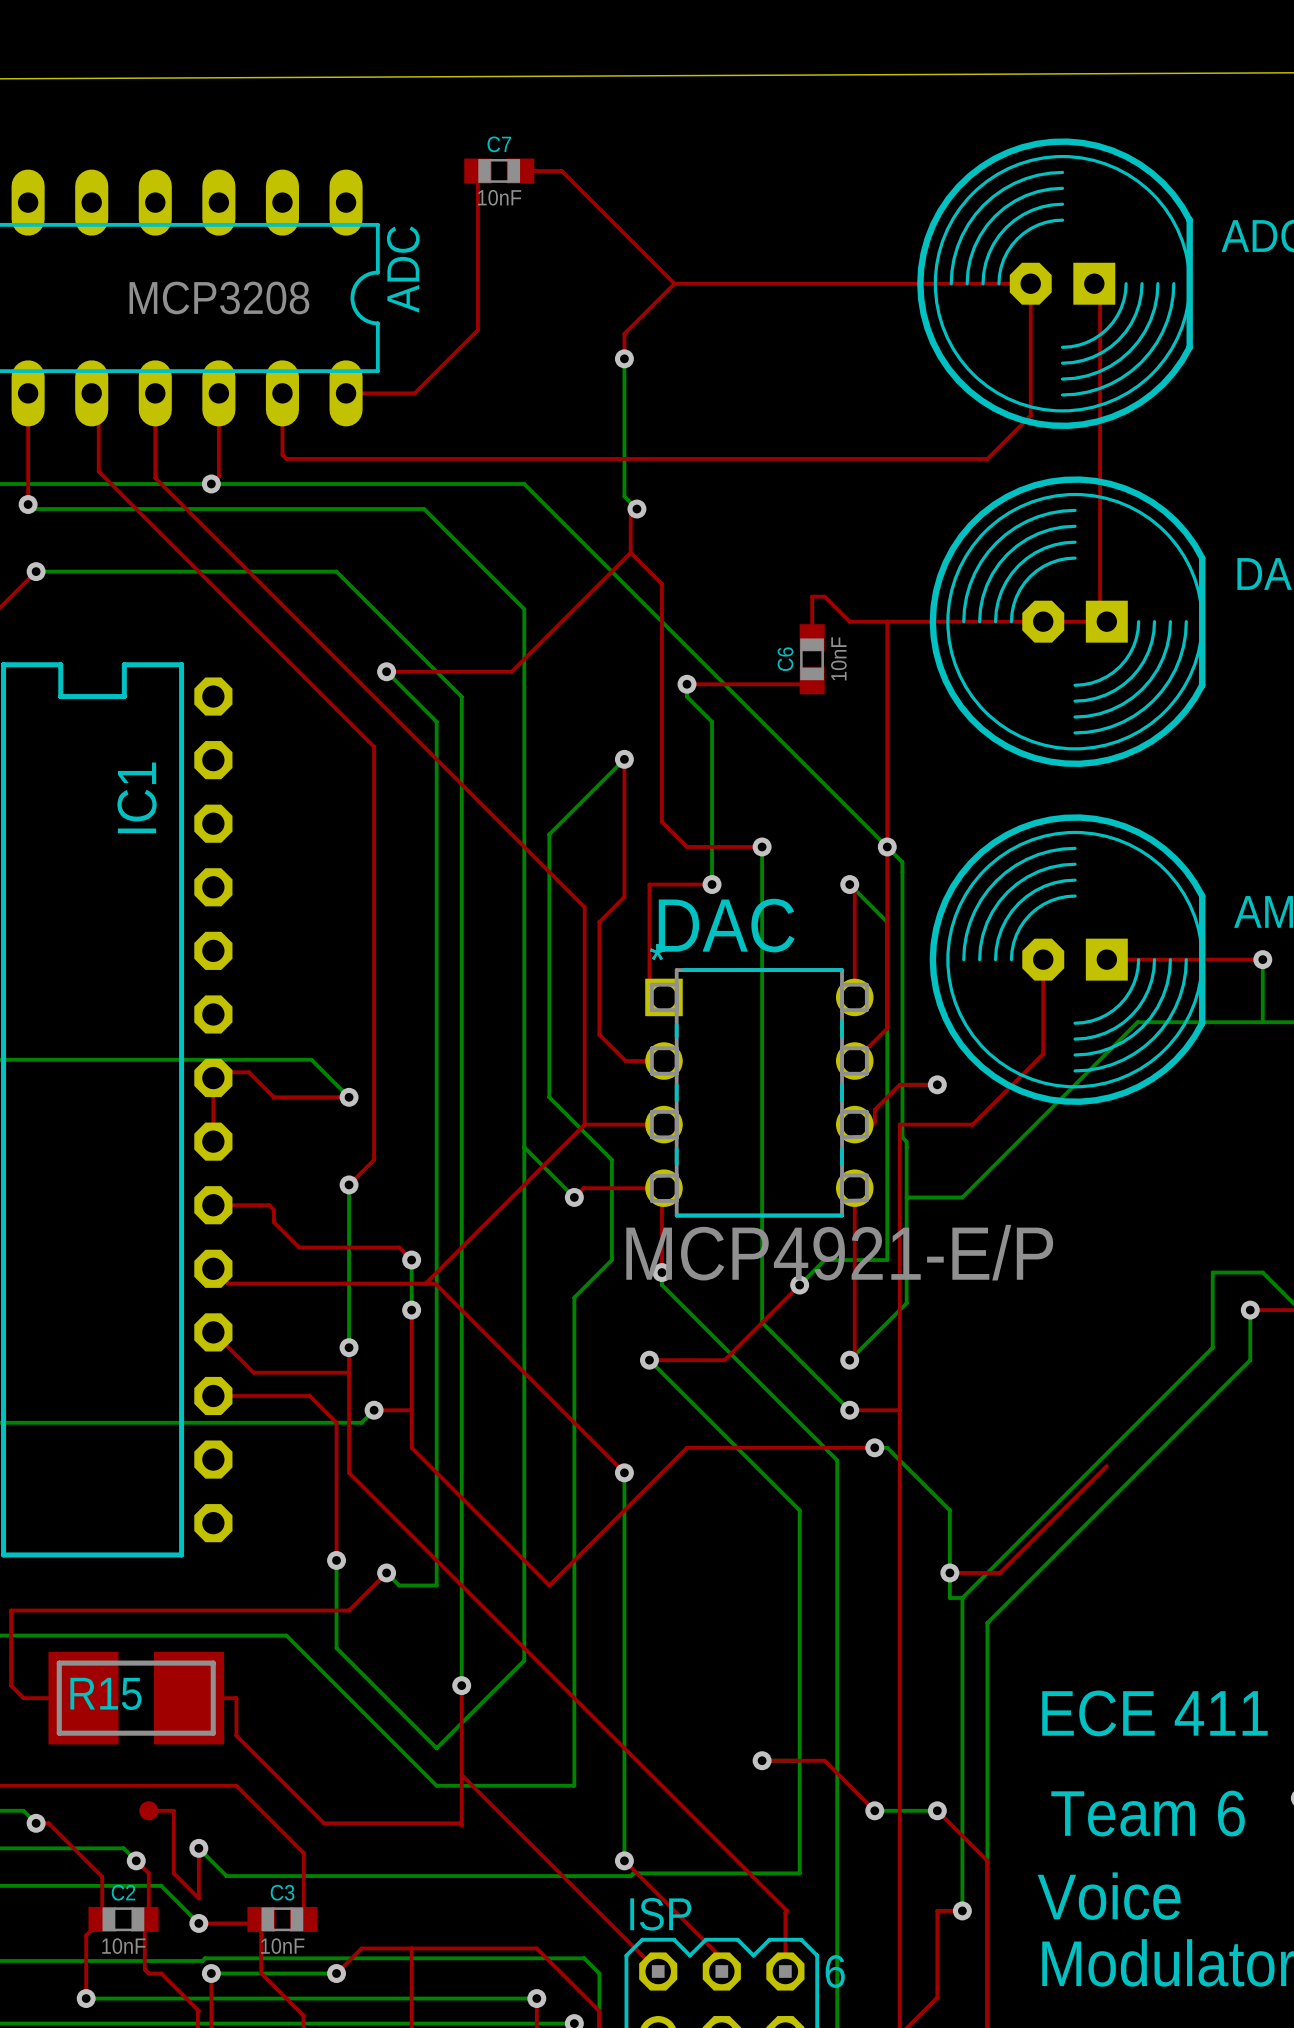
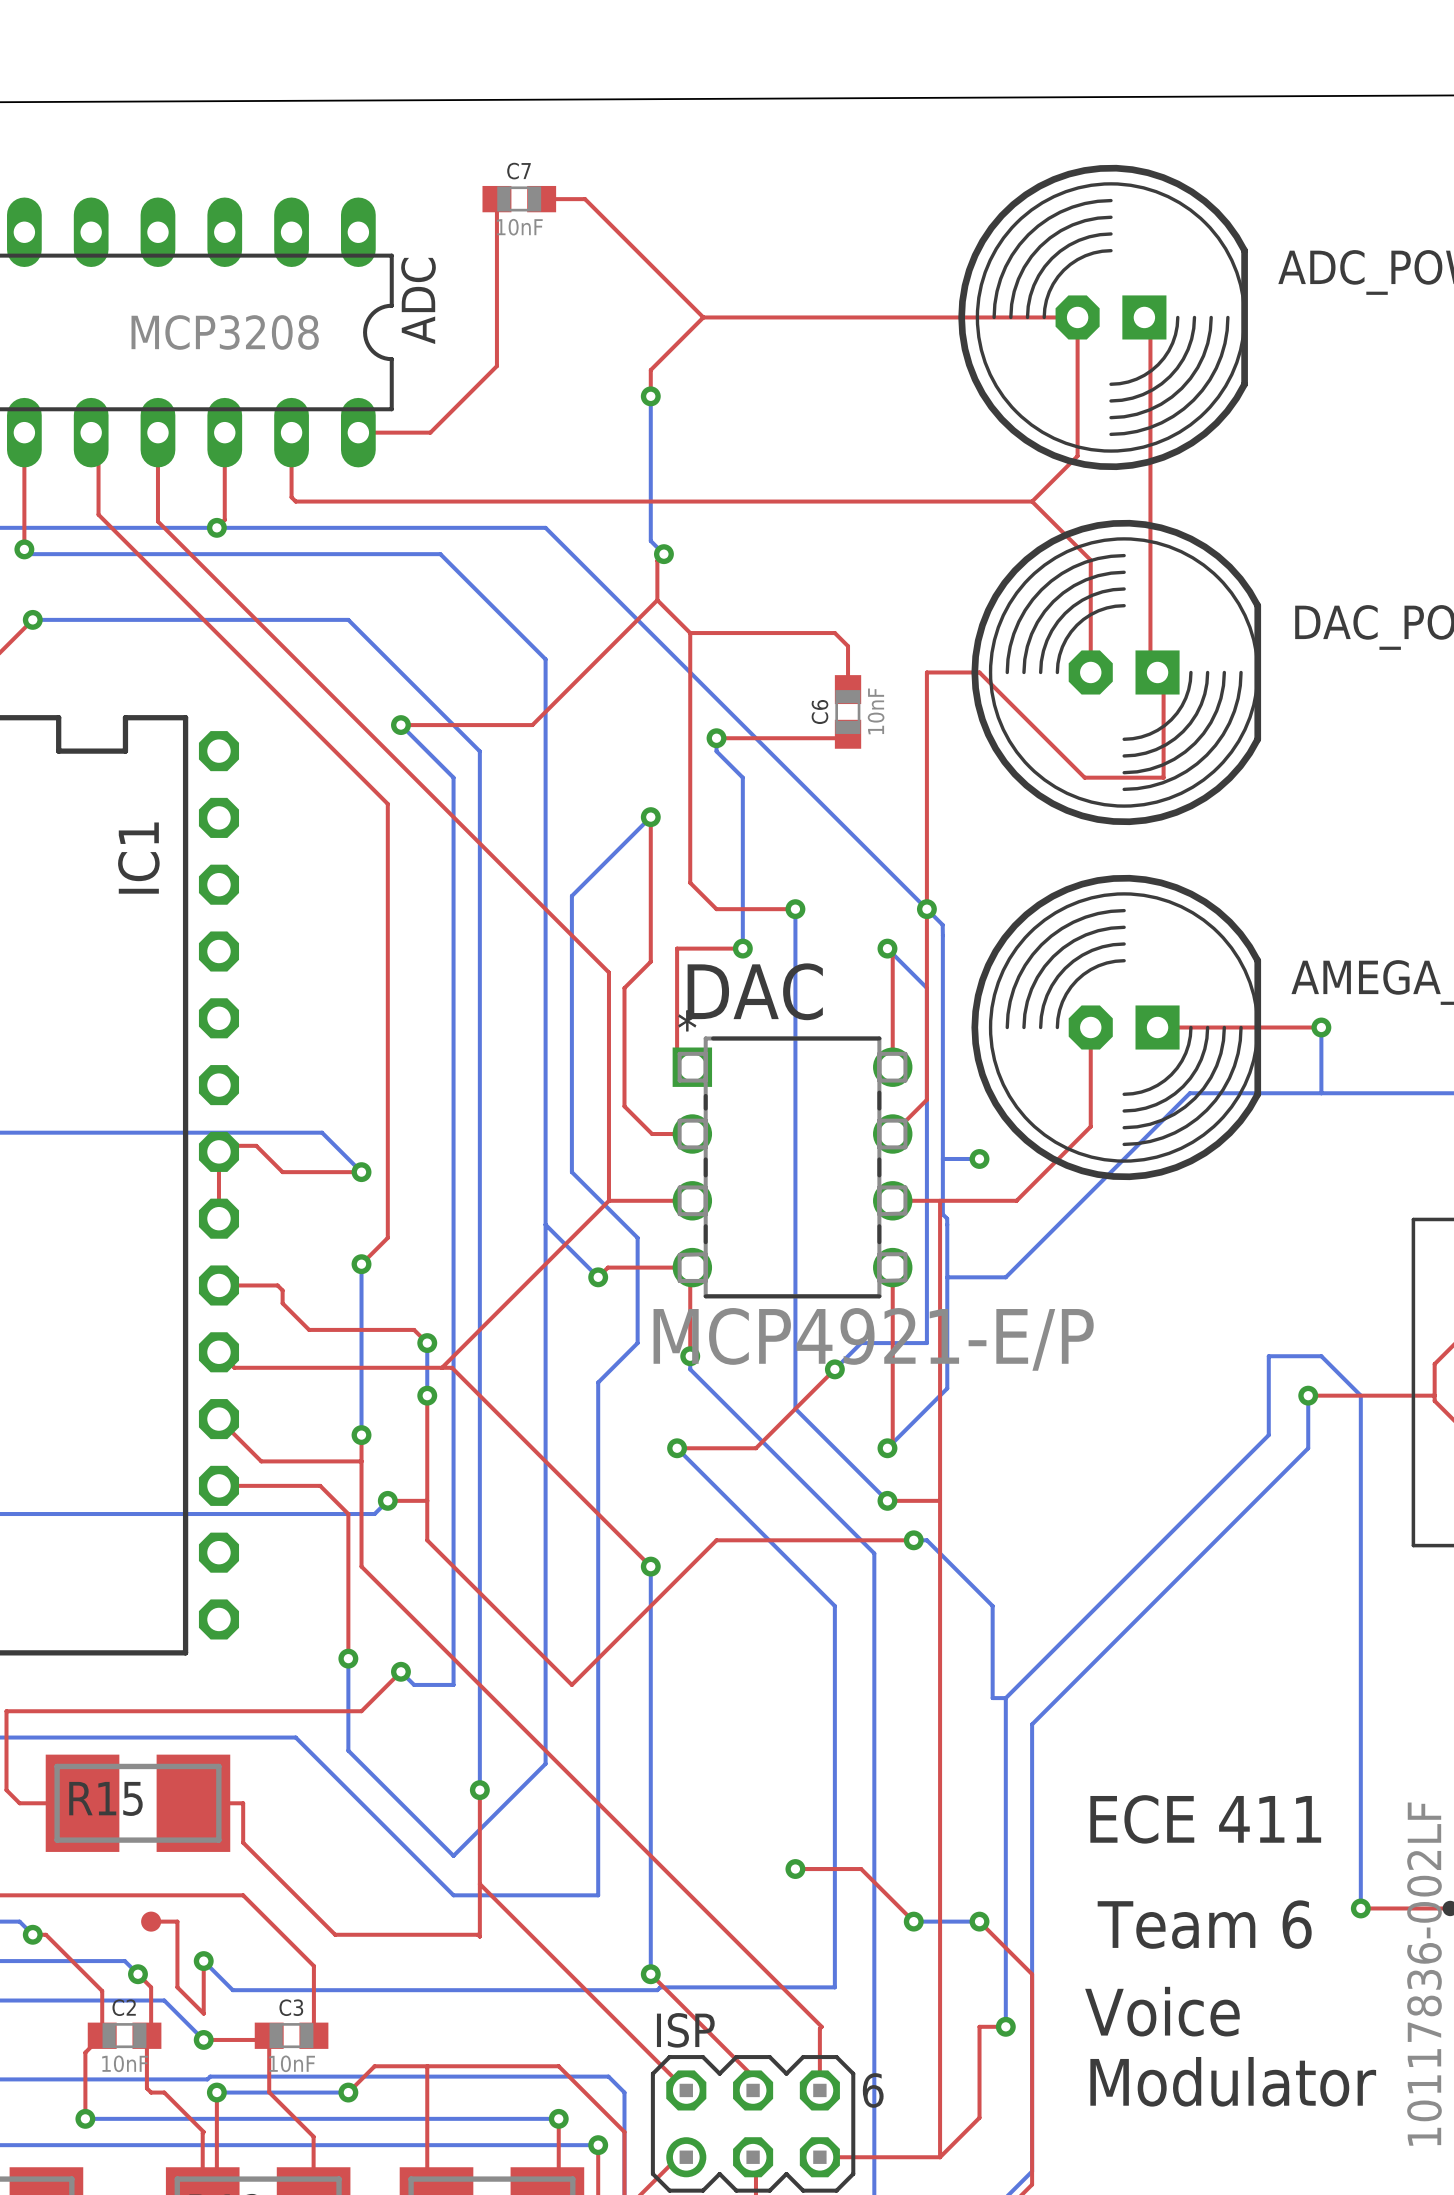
top track: none -> (1032, 501) (1090, 560) (1090, 672)
top track: (812, 596) (824, 596) (849, 621) (887, 621) -> (848, 646) (834, 633) (690, 633)
top track: (937, 621) (1100, 621) -> (979, 672) (1084, 777) (1163, 777) (1163, 678) (1157, 672)
top track: (937, 1084) (899, 1084) (874, 1109) (874, 1122) (872, 1124) -> (940, 1200) (911, 1200)
top track: (1106, 1466) (999, 1572) (949, 1572) -> none
via: (949, 1572) -> none

